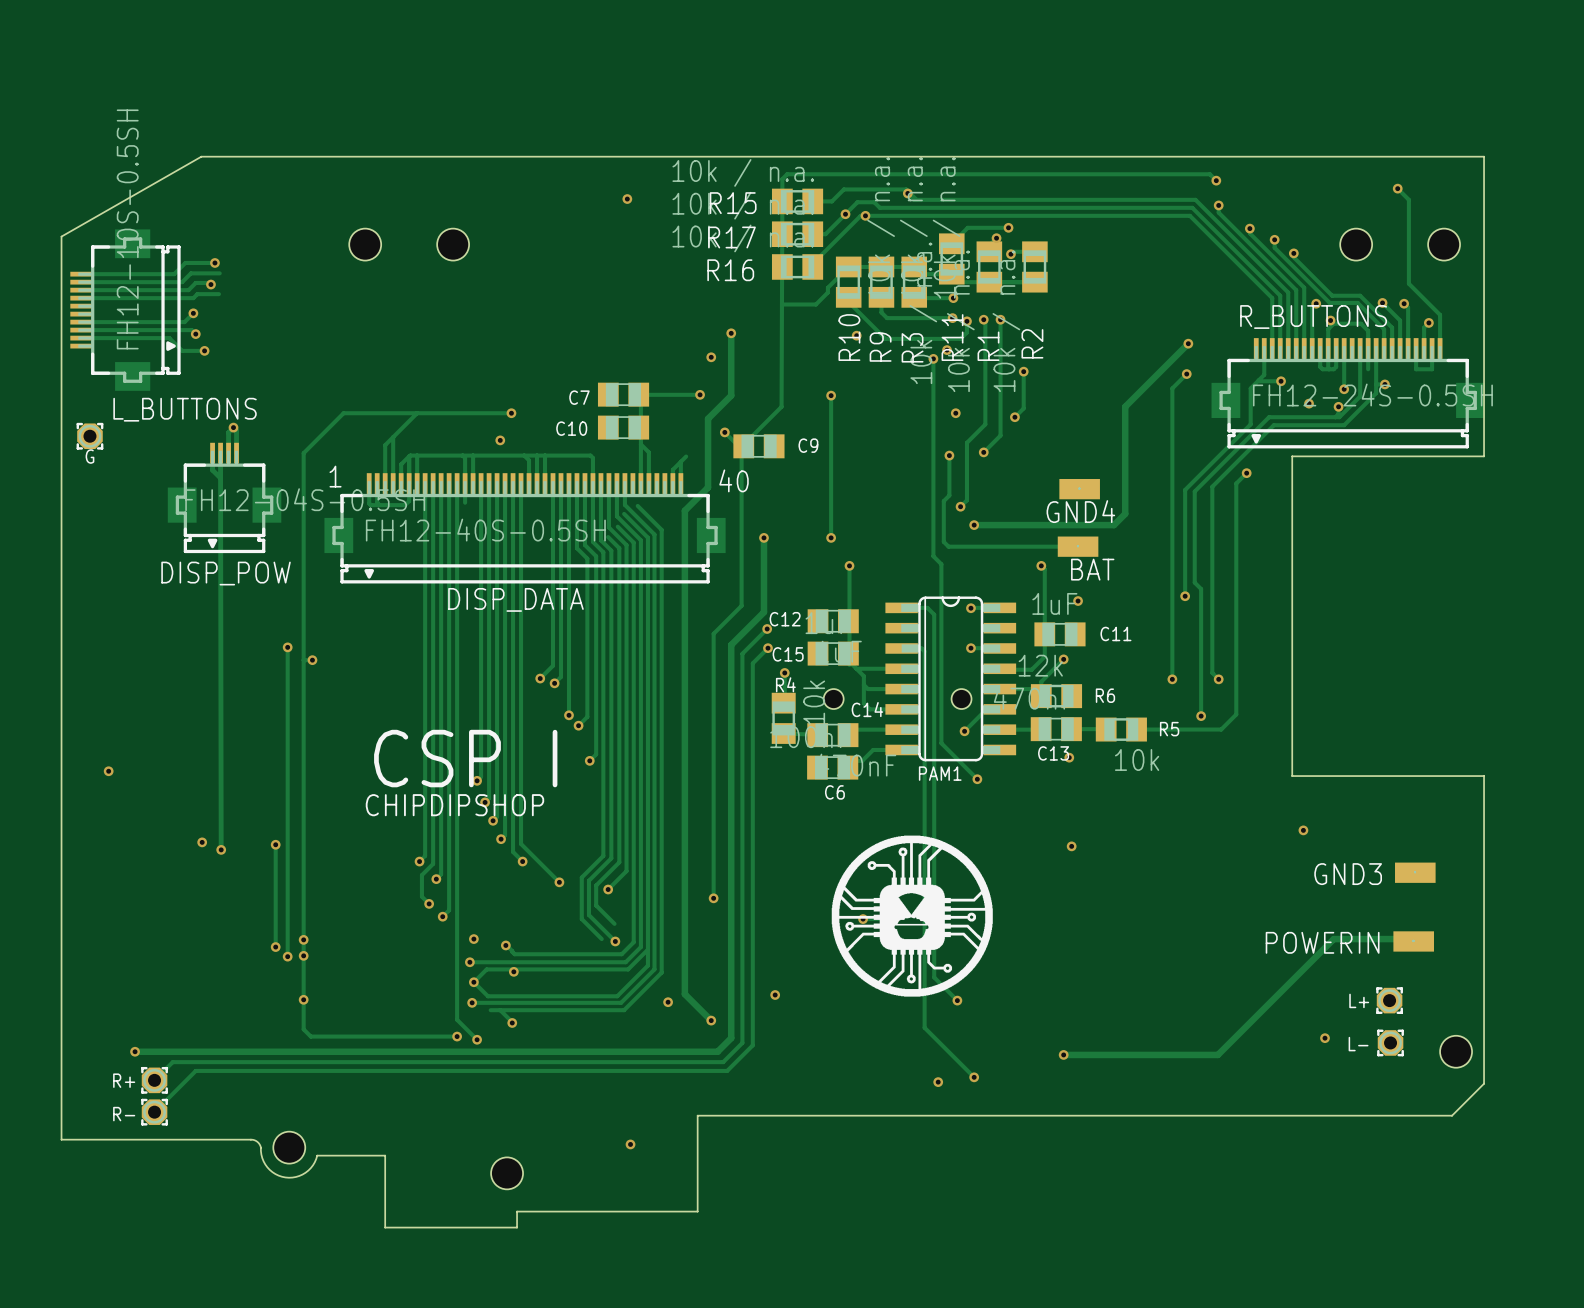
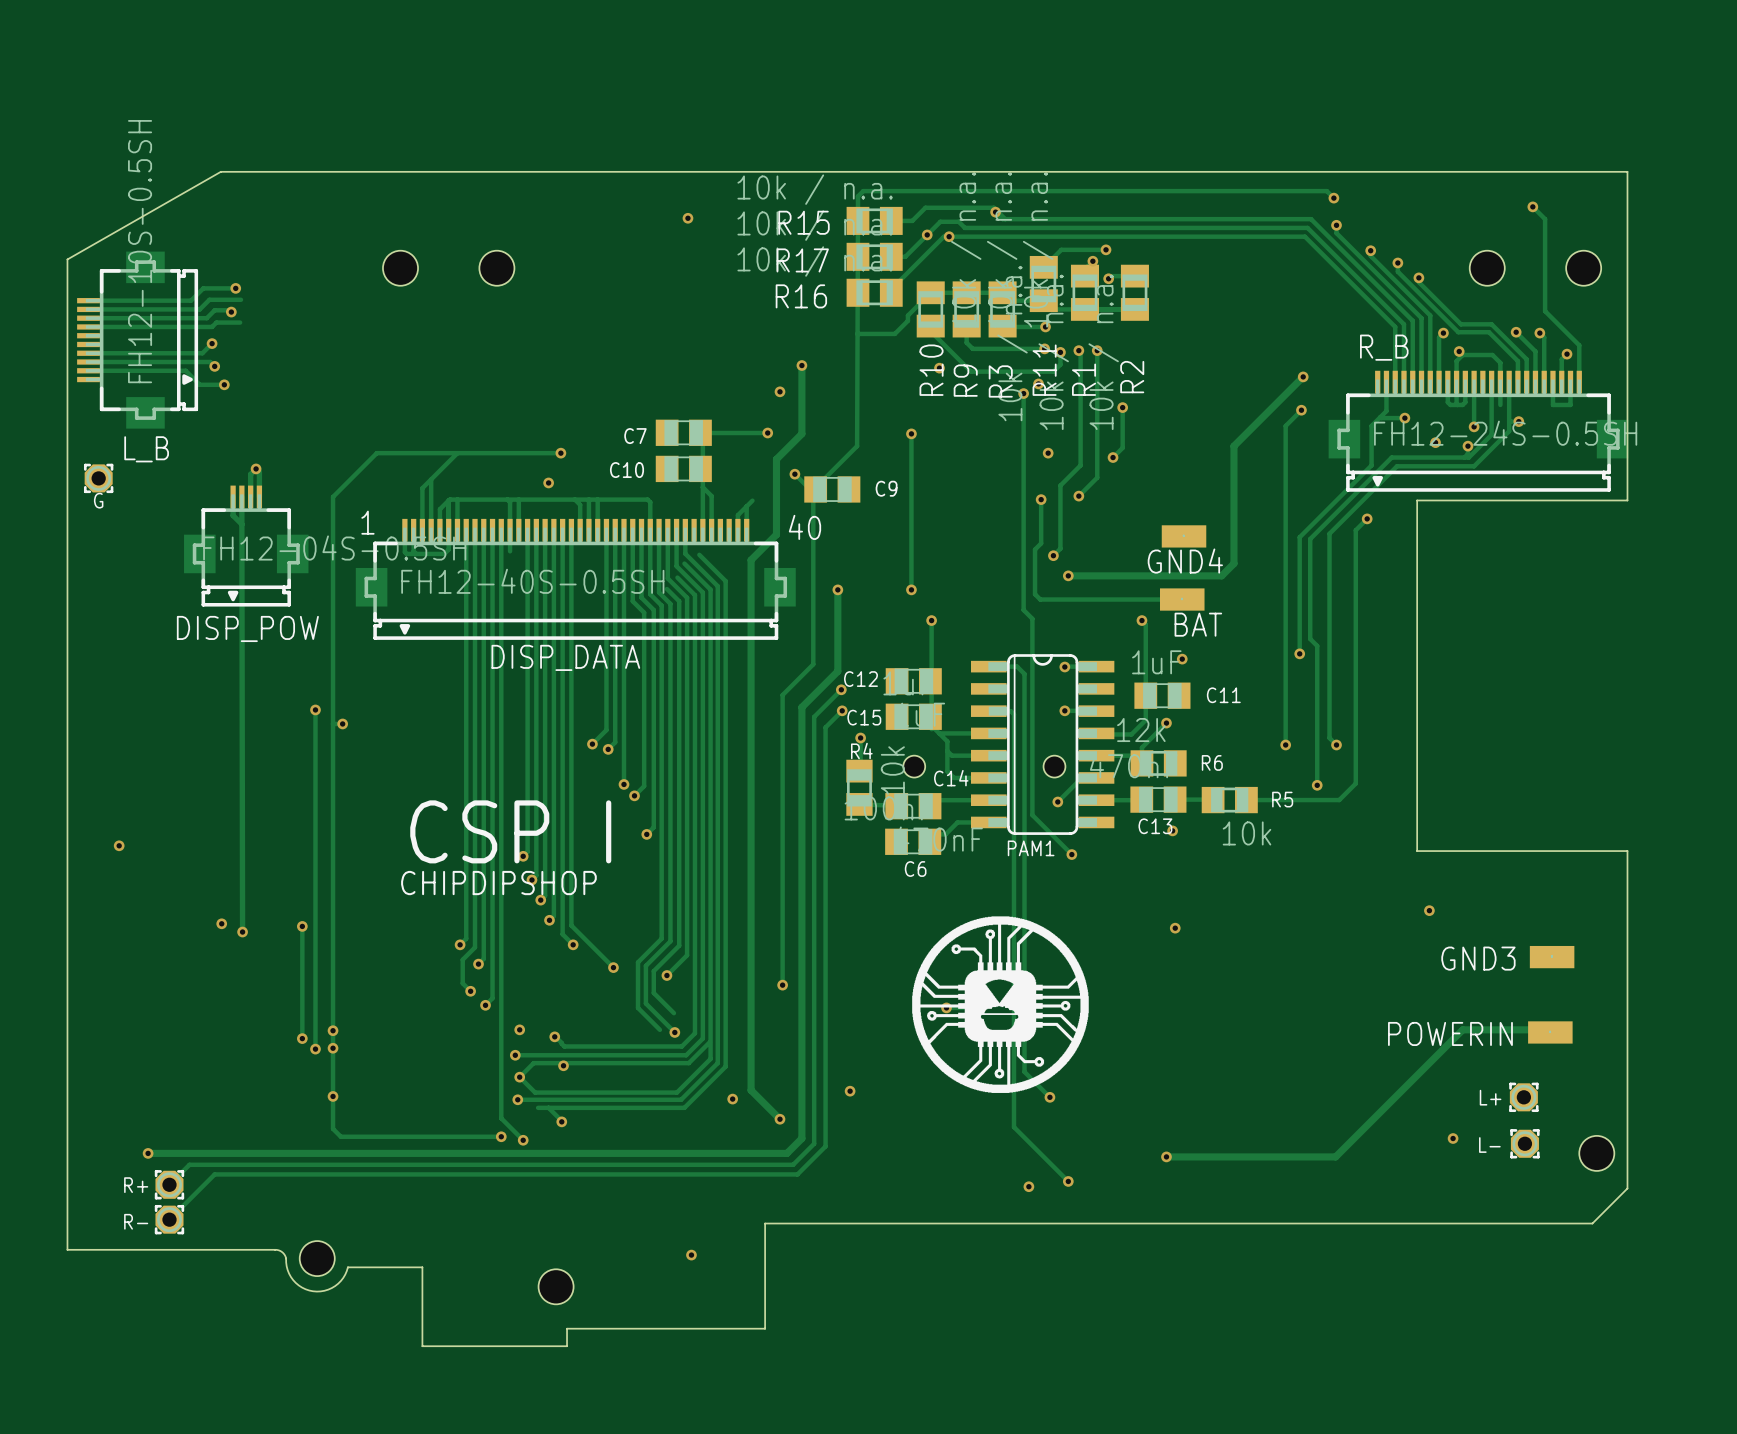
R_BUTTONS name: R_BUTTONS (1313, 317) -> R_B (1384, 347)
L_BUTTONS name: L_BUTTONS (185, 409) -> L_B (146, 449)

